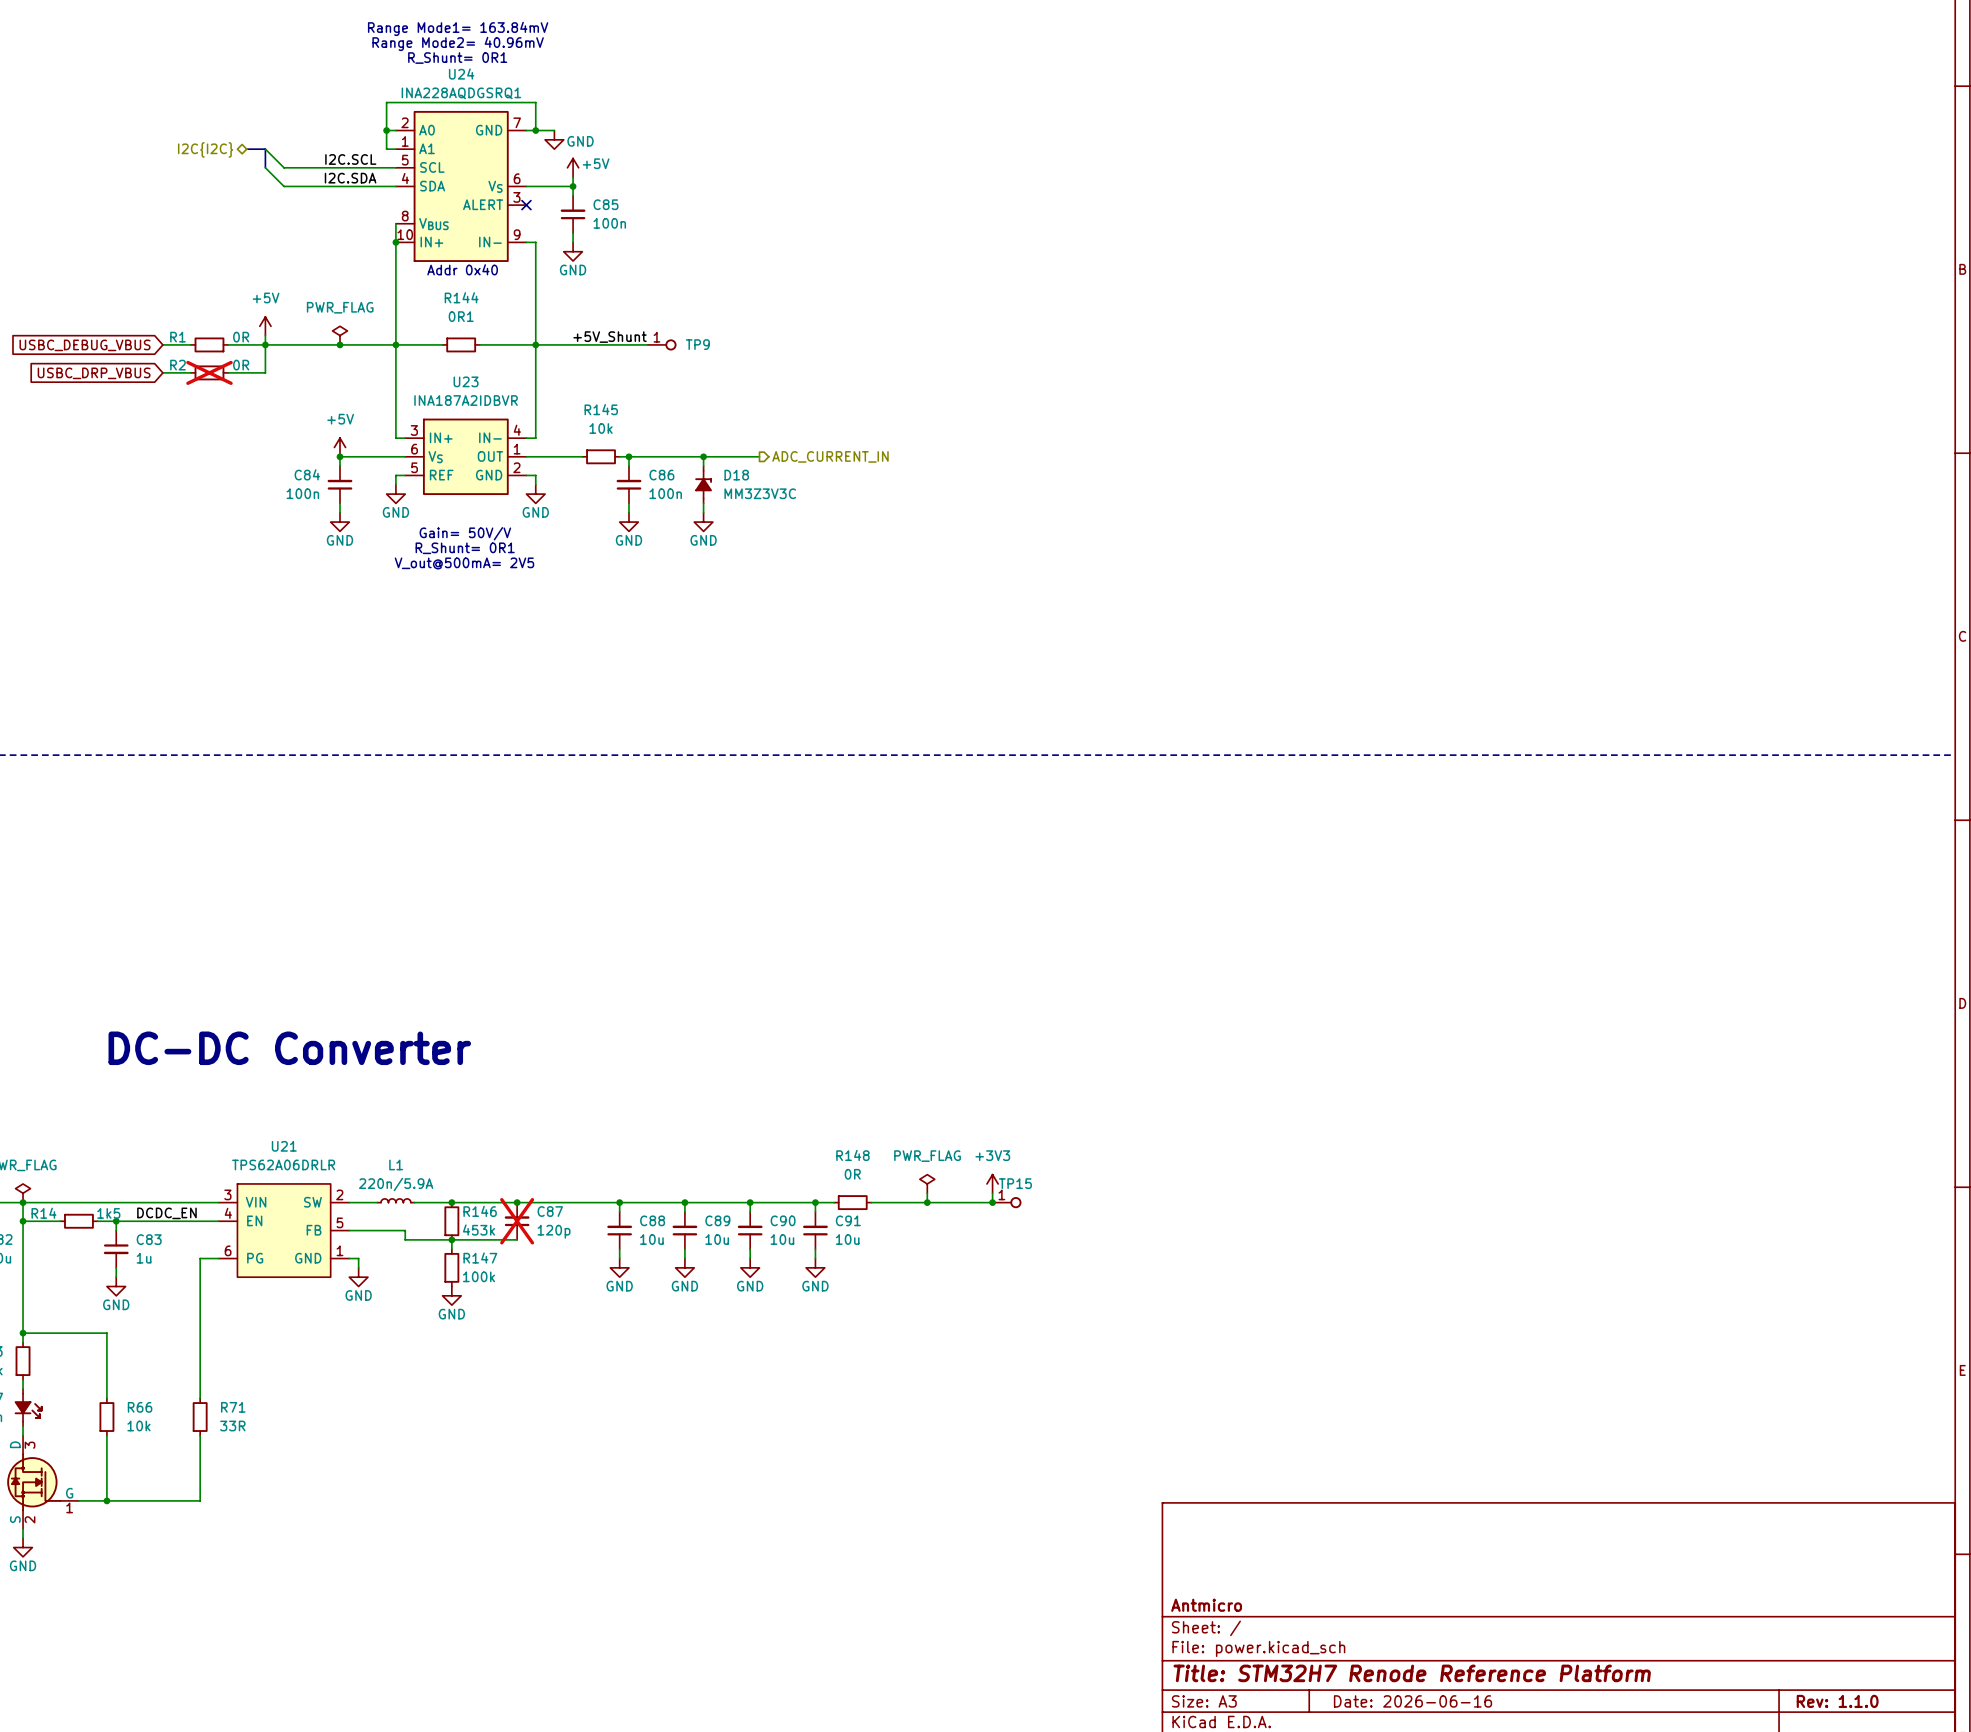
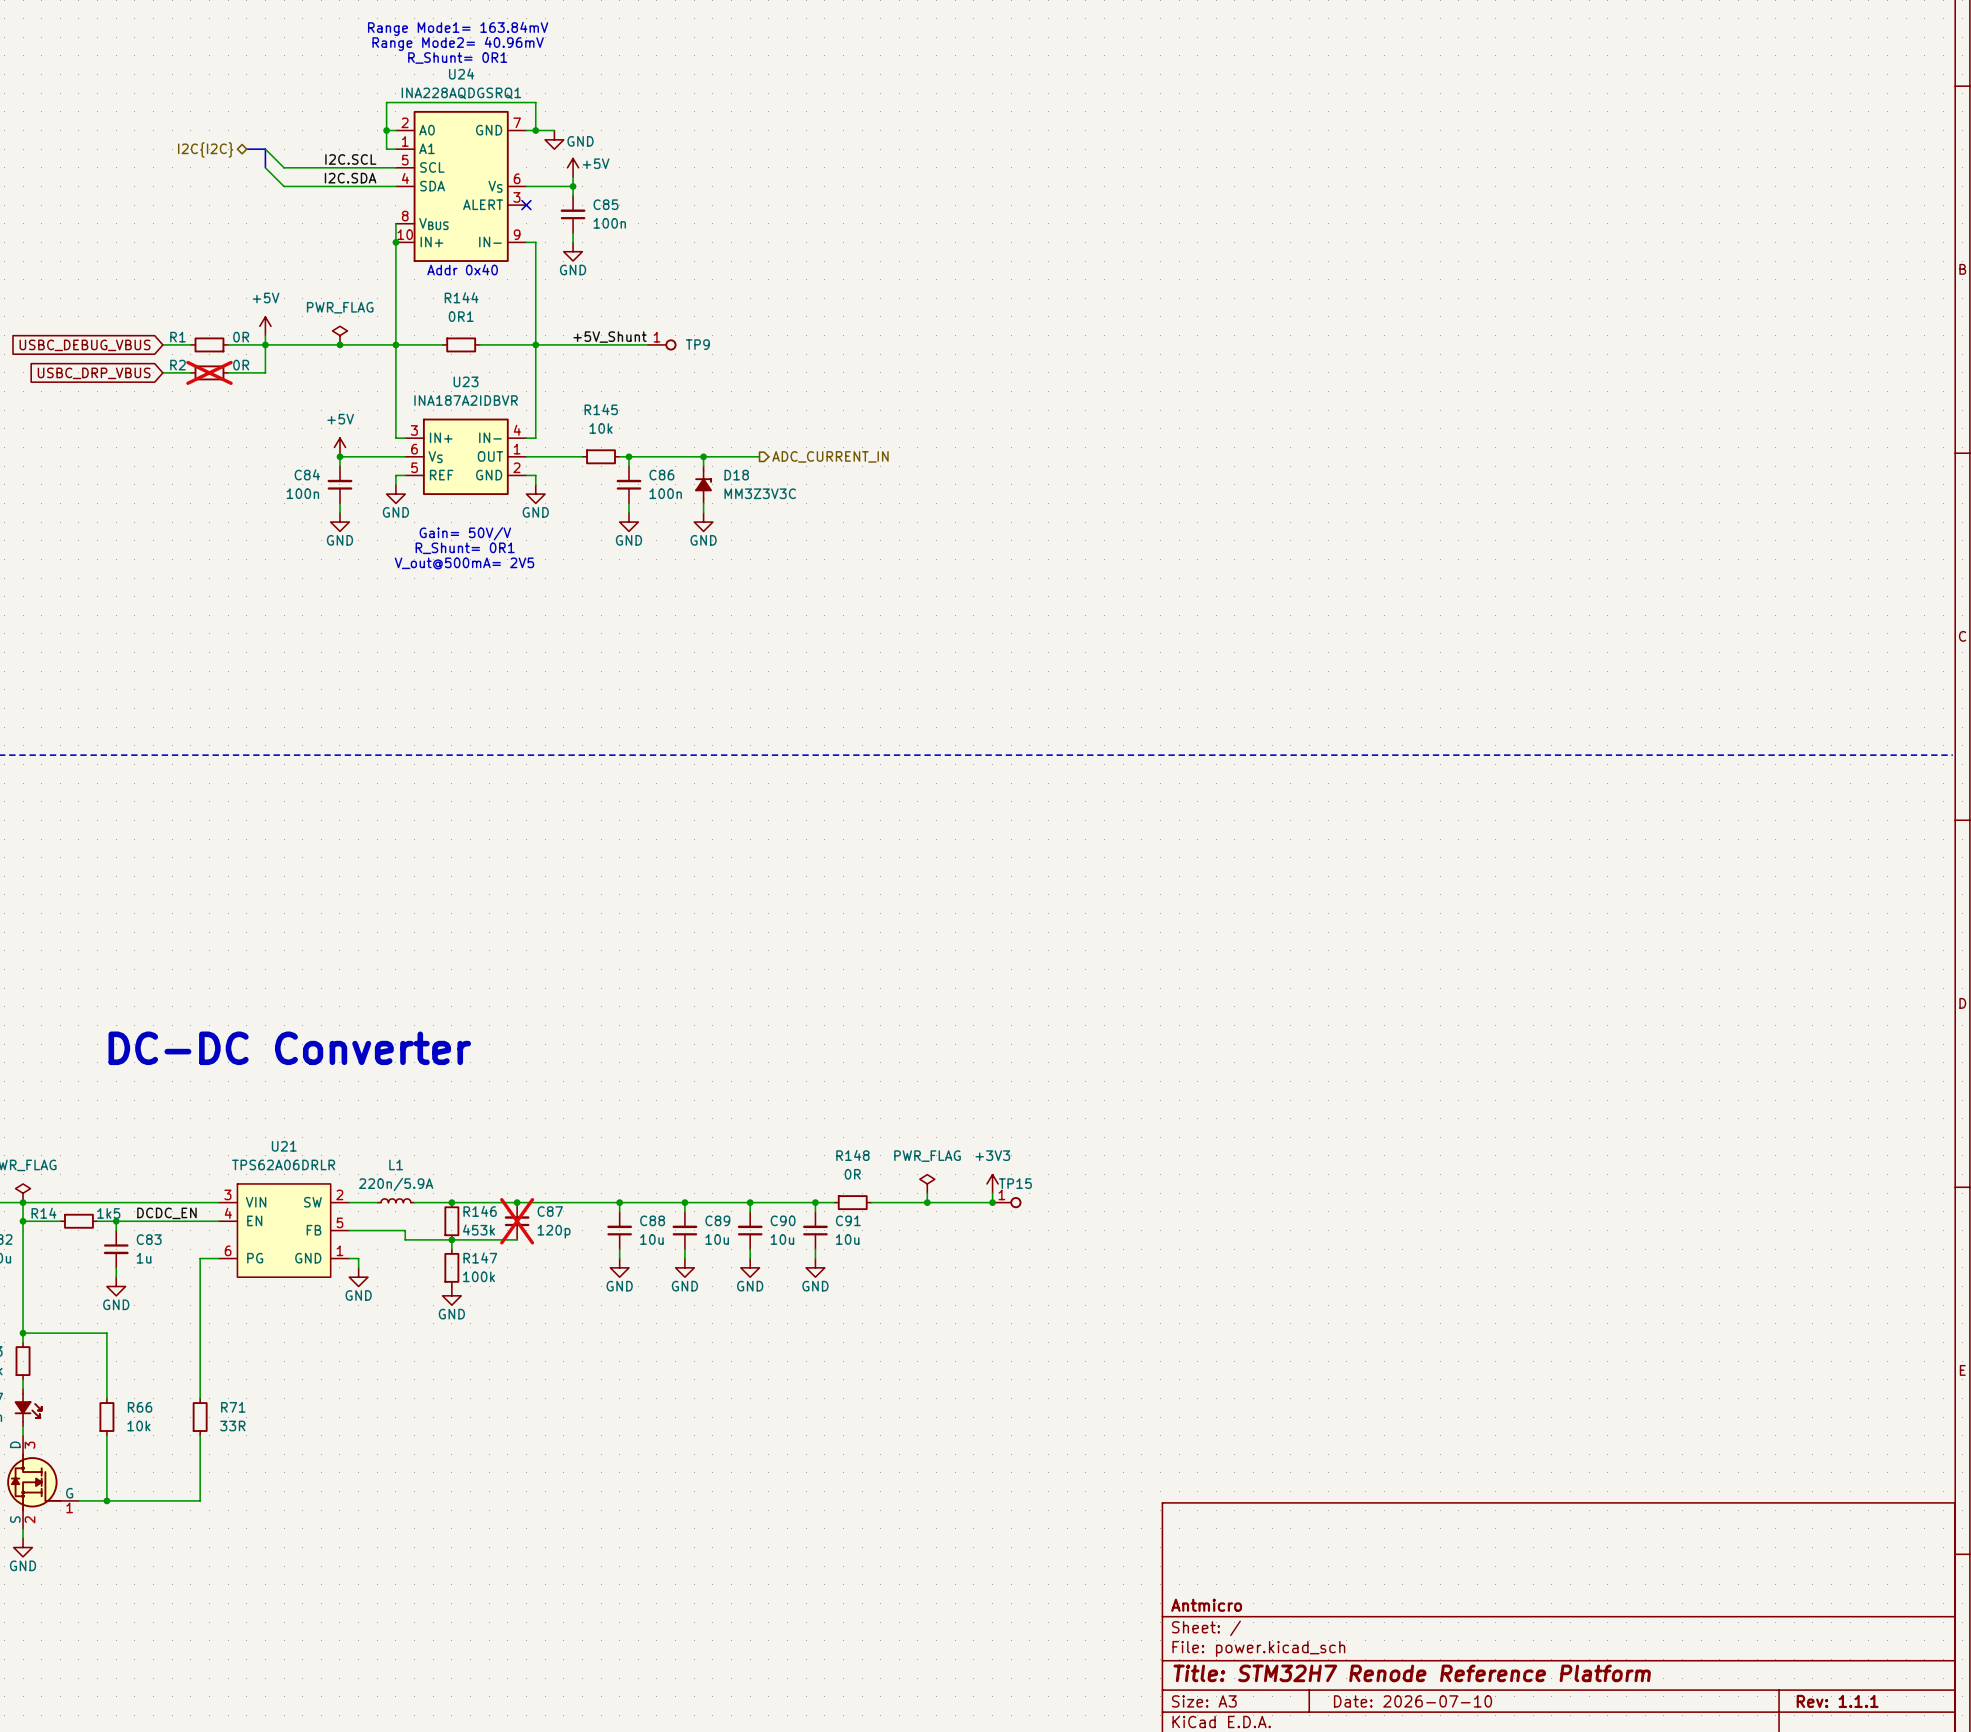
title block: Date: 2026-06-16 (1413, 1701) -> Date: 2026-07-10 (1413, 1701)
title block: Rev: 1.1.0 (1837, 1701) -> Rev: 1.1.1 (1837, 1701)

